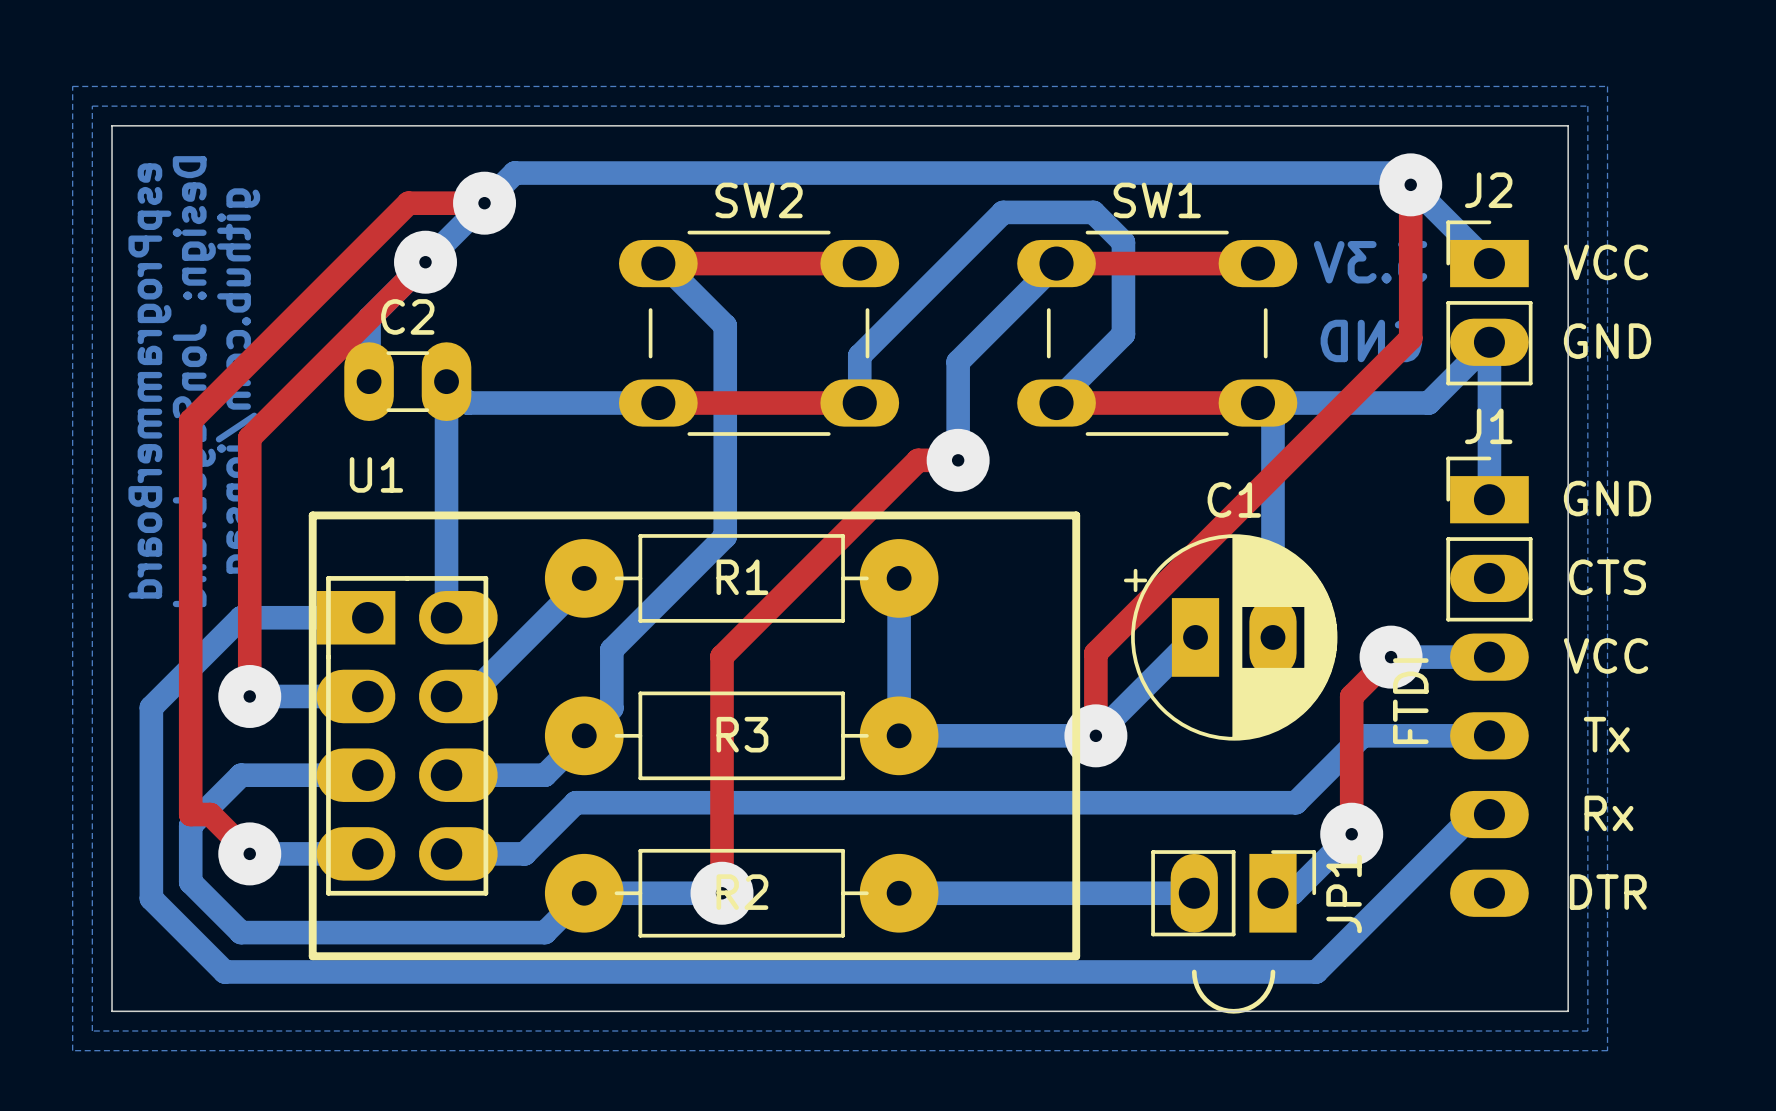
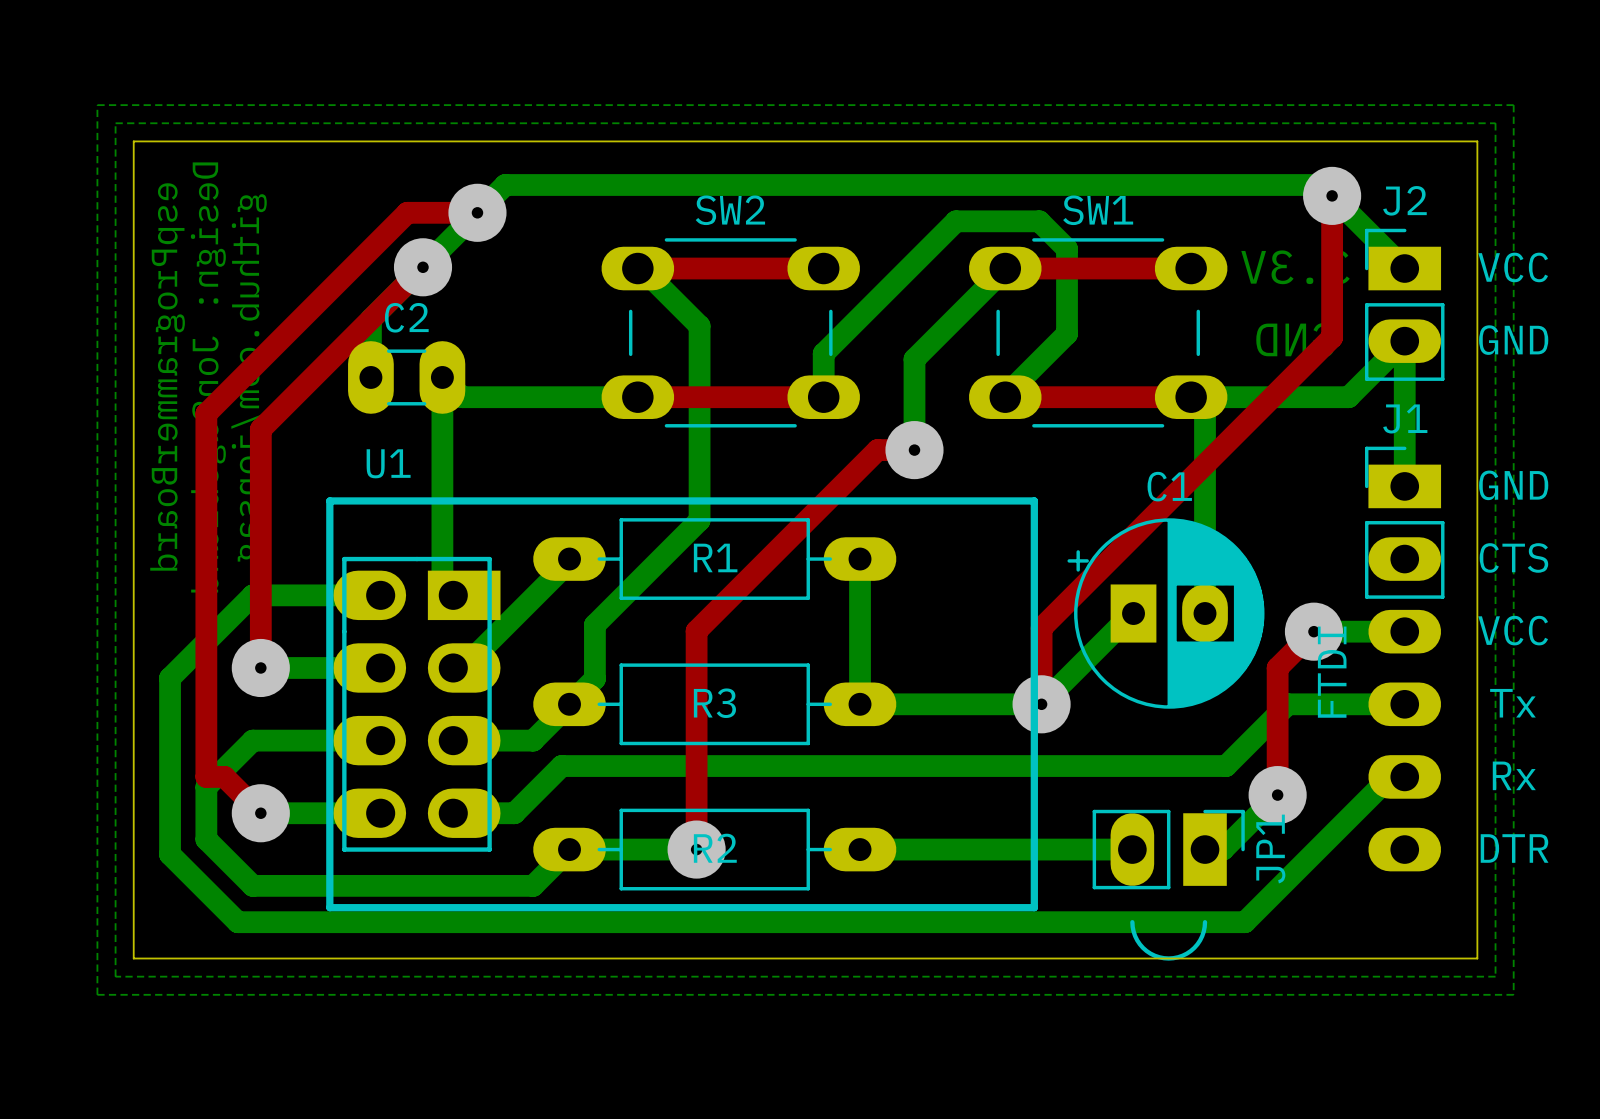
U1 footprint: [308, 511, 1081, 961] -> [326, 497, 1038, 912]
R1 footprint: [544, 534, 939, 623] -> [533, 518, 897, 600]
C1 footprint: [1123, 534, 1338, 741] -> [1067, 518, 1265, 709]
R3 footprint: [544, 691, 939, 781] -> [533, 663, 897, 746]
R2 footprint: [544, 848, 939, 938] -> [533, 808, 897, 891]

